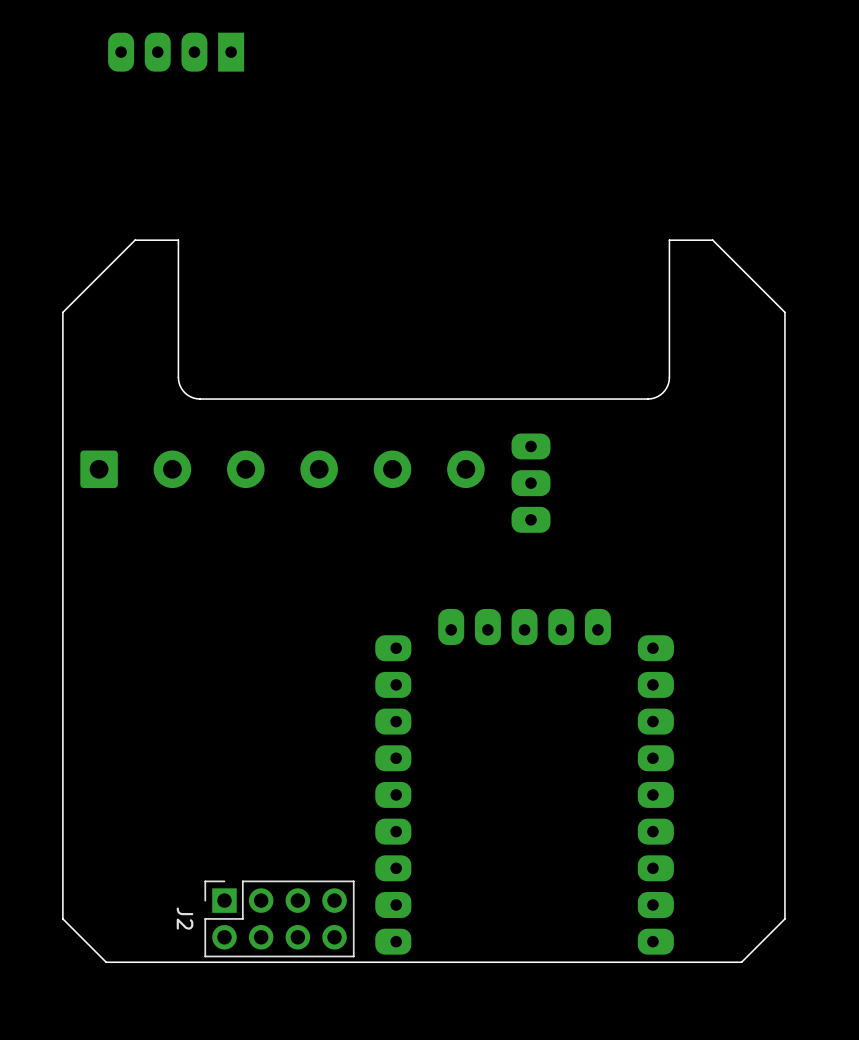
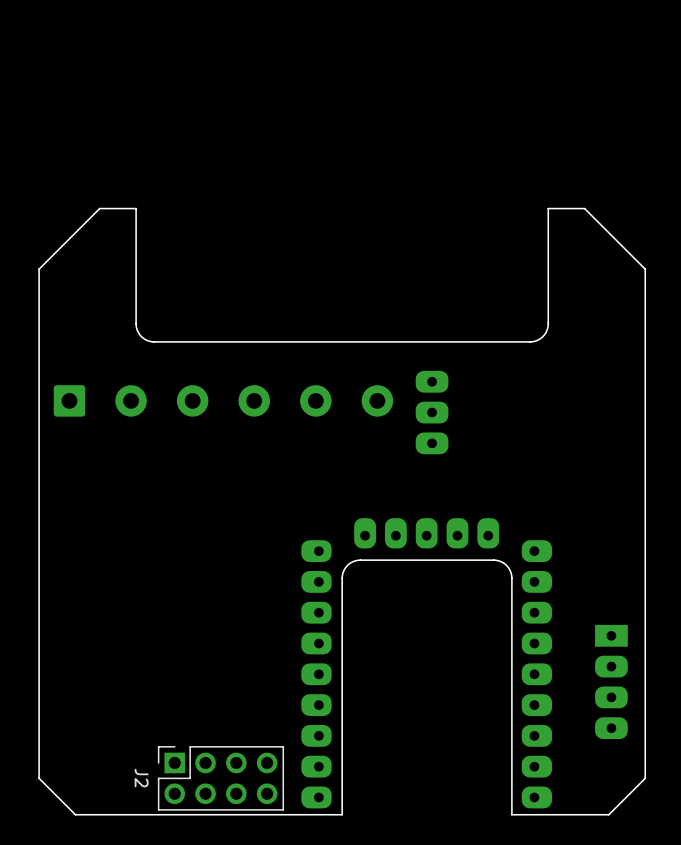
part: (176, 52) -> none
part: none -> (611, 681)
board edge: (626, 962) (423, 962) -> (511, 814) (511, 575) (506, 565) (493, 560) (360, 560) (351, 562) (344, 569) (342, 578) (342, 814)

